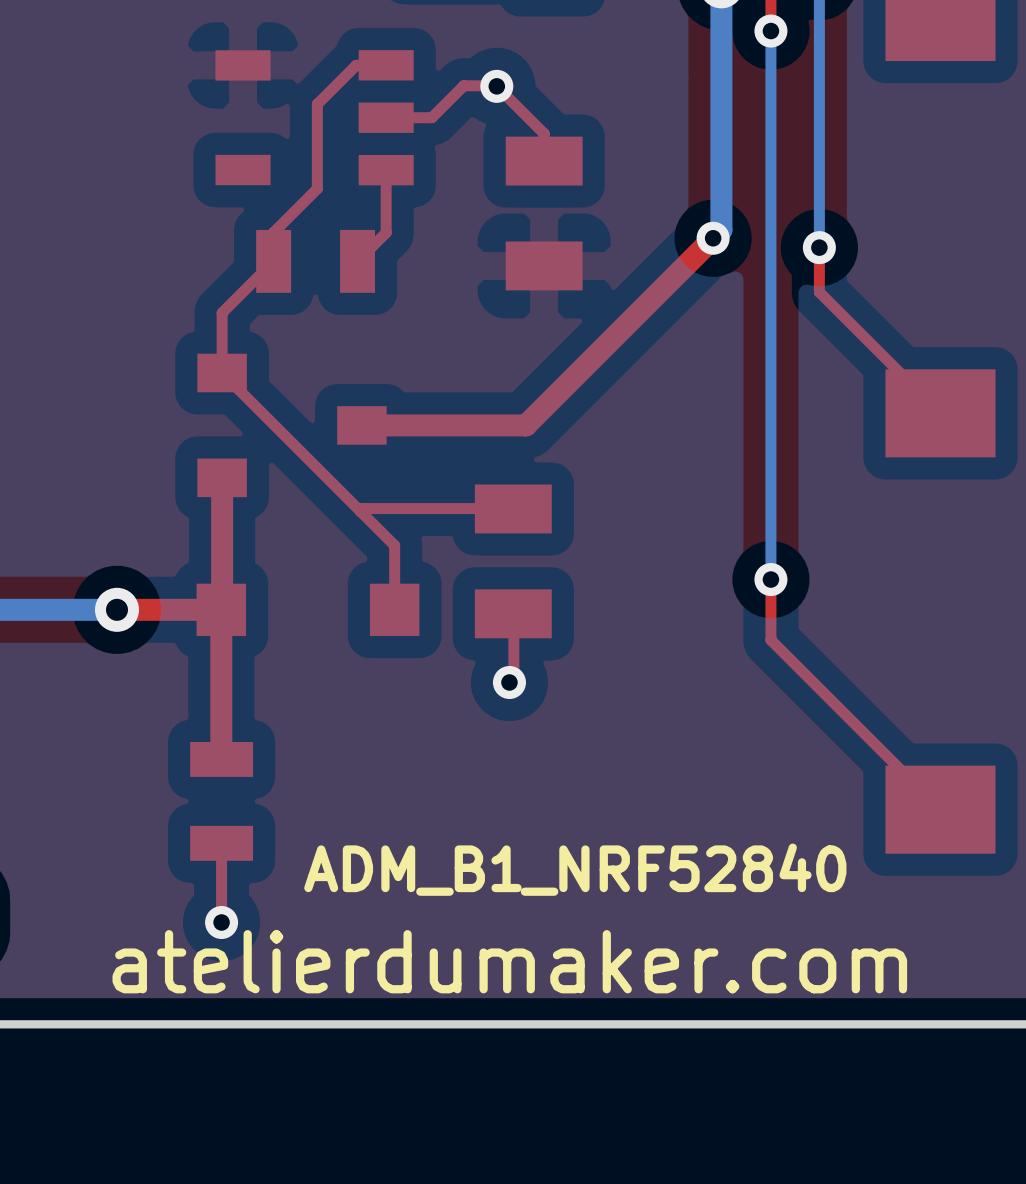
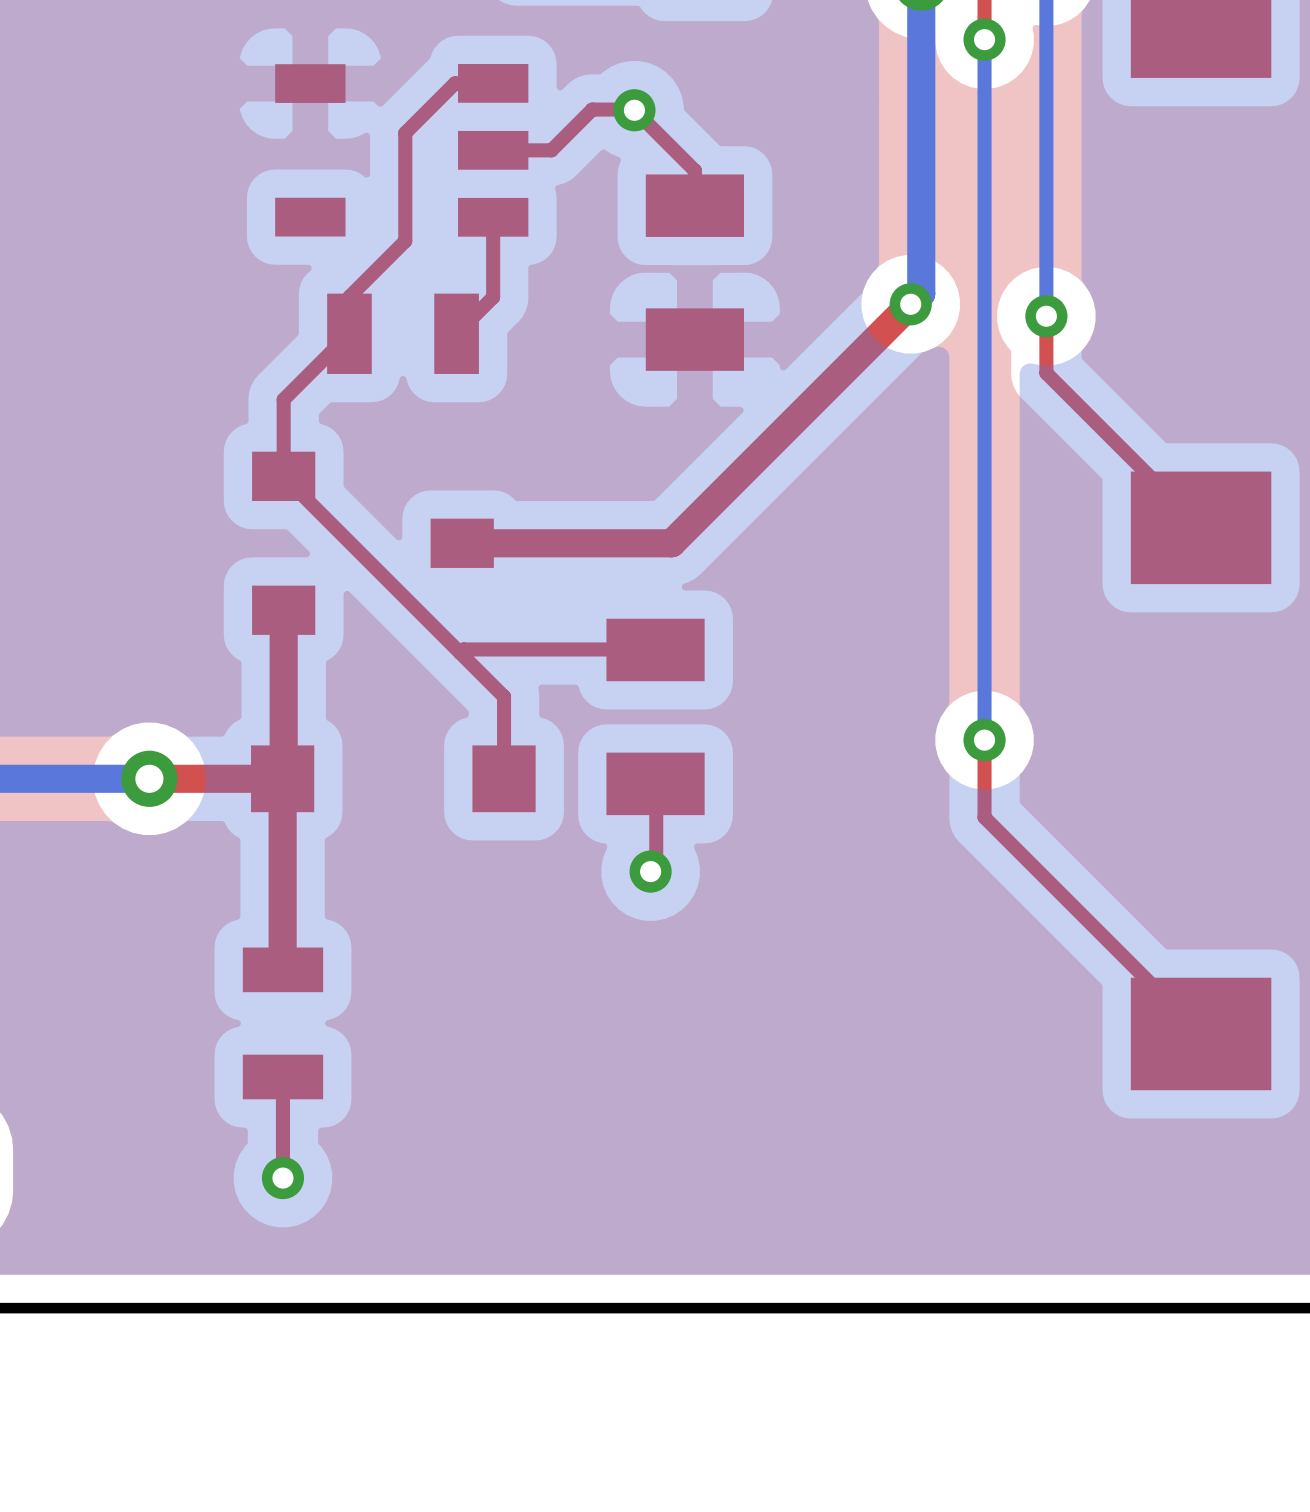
text: ADM_B1_NRF52840 (575, 869) -> none
text: atelierdumaker.com (509, 961) -> none

